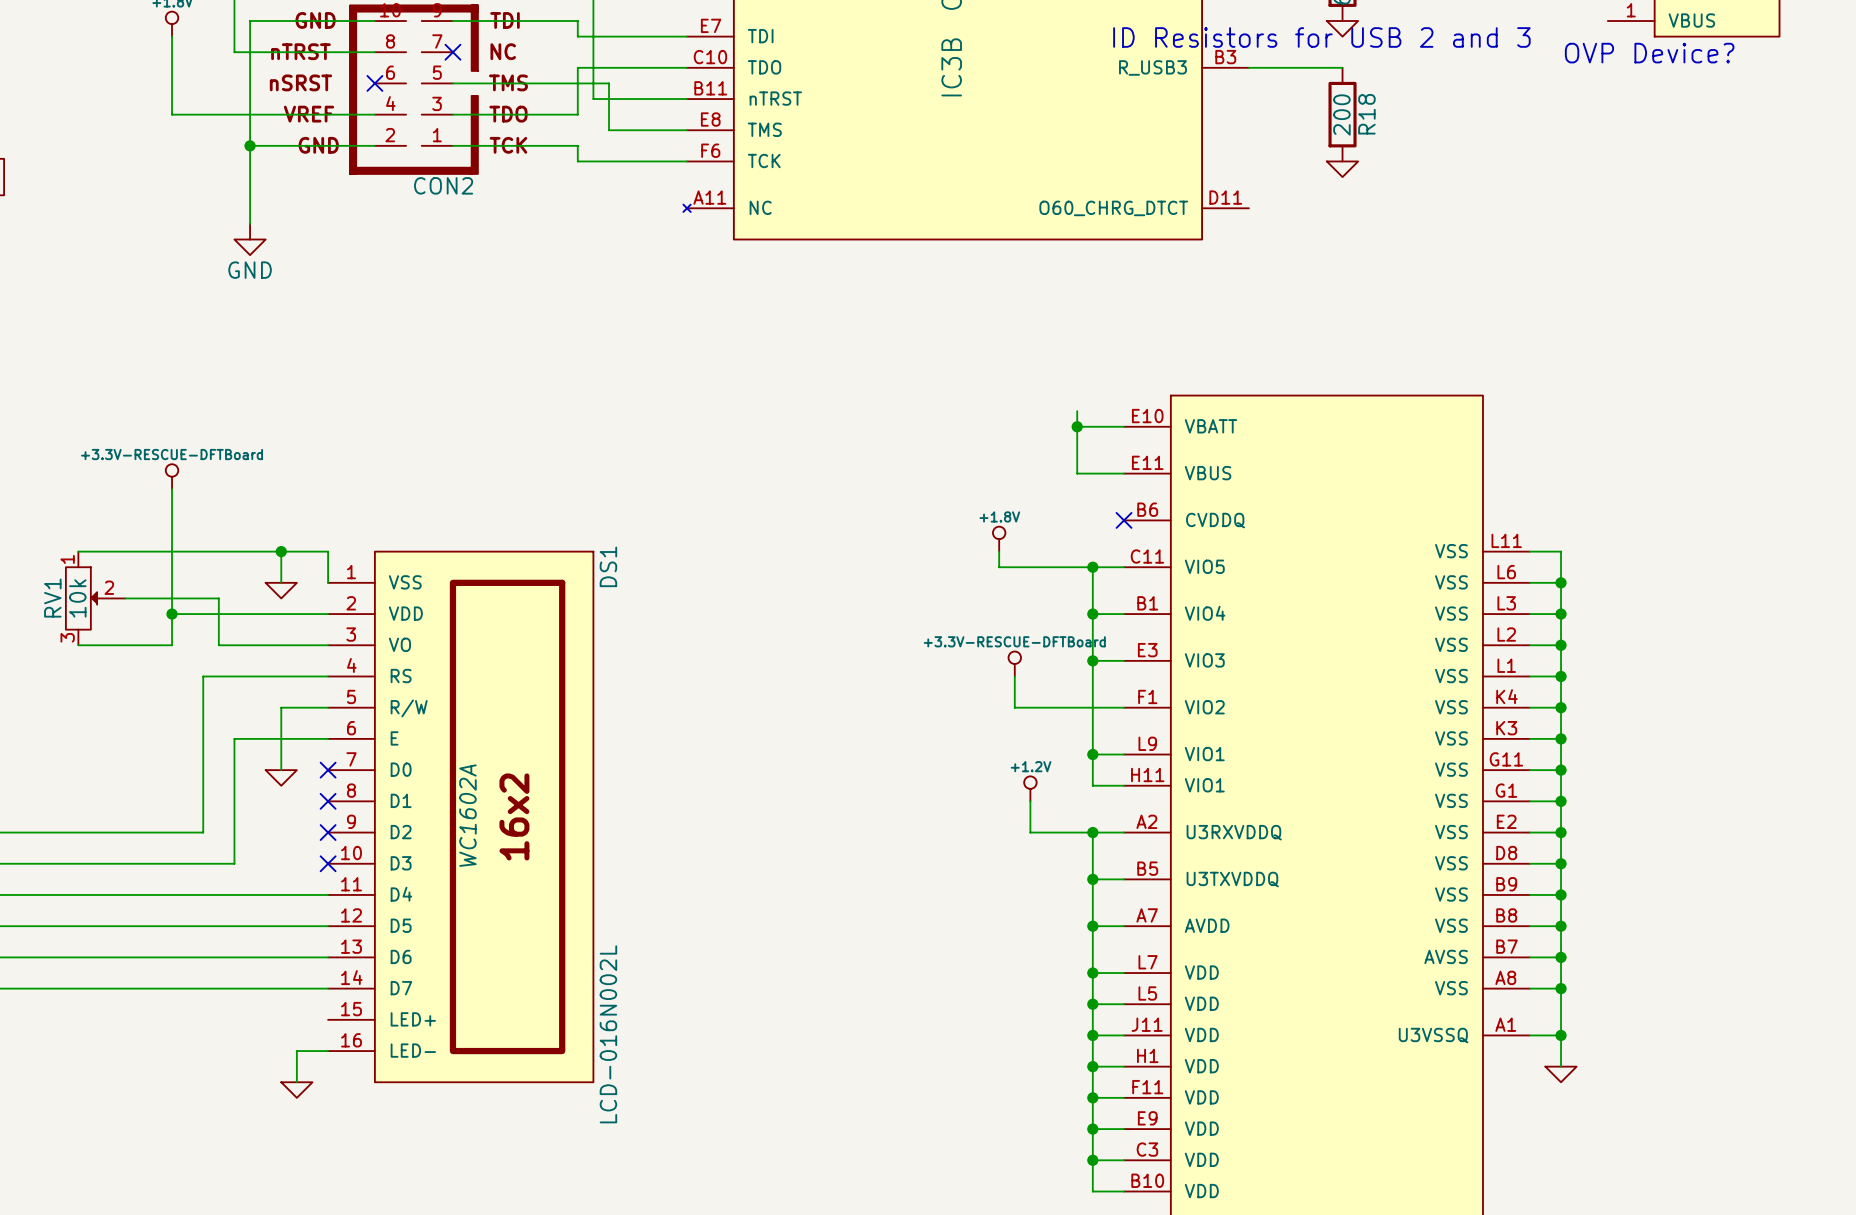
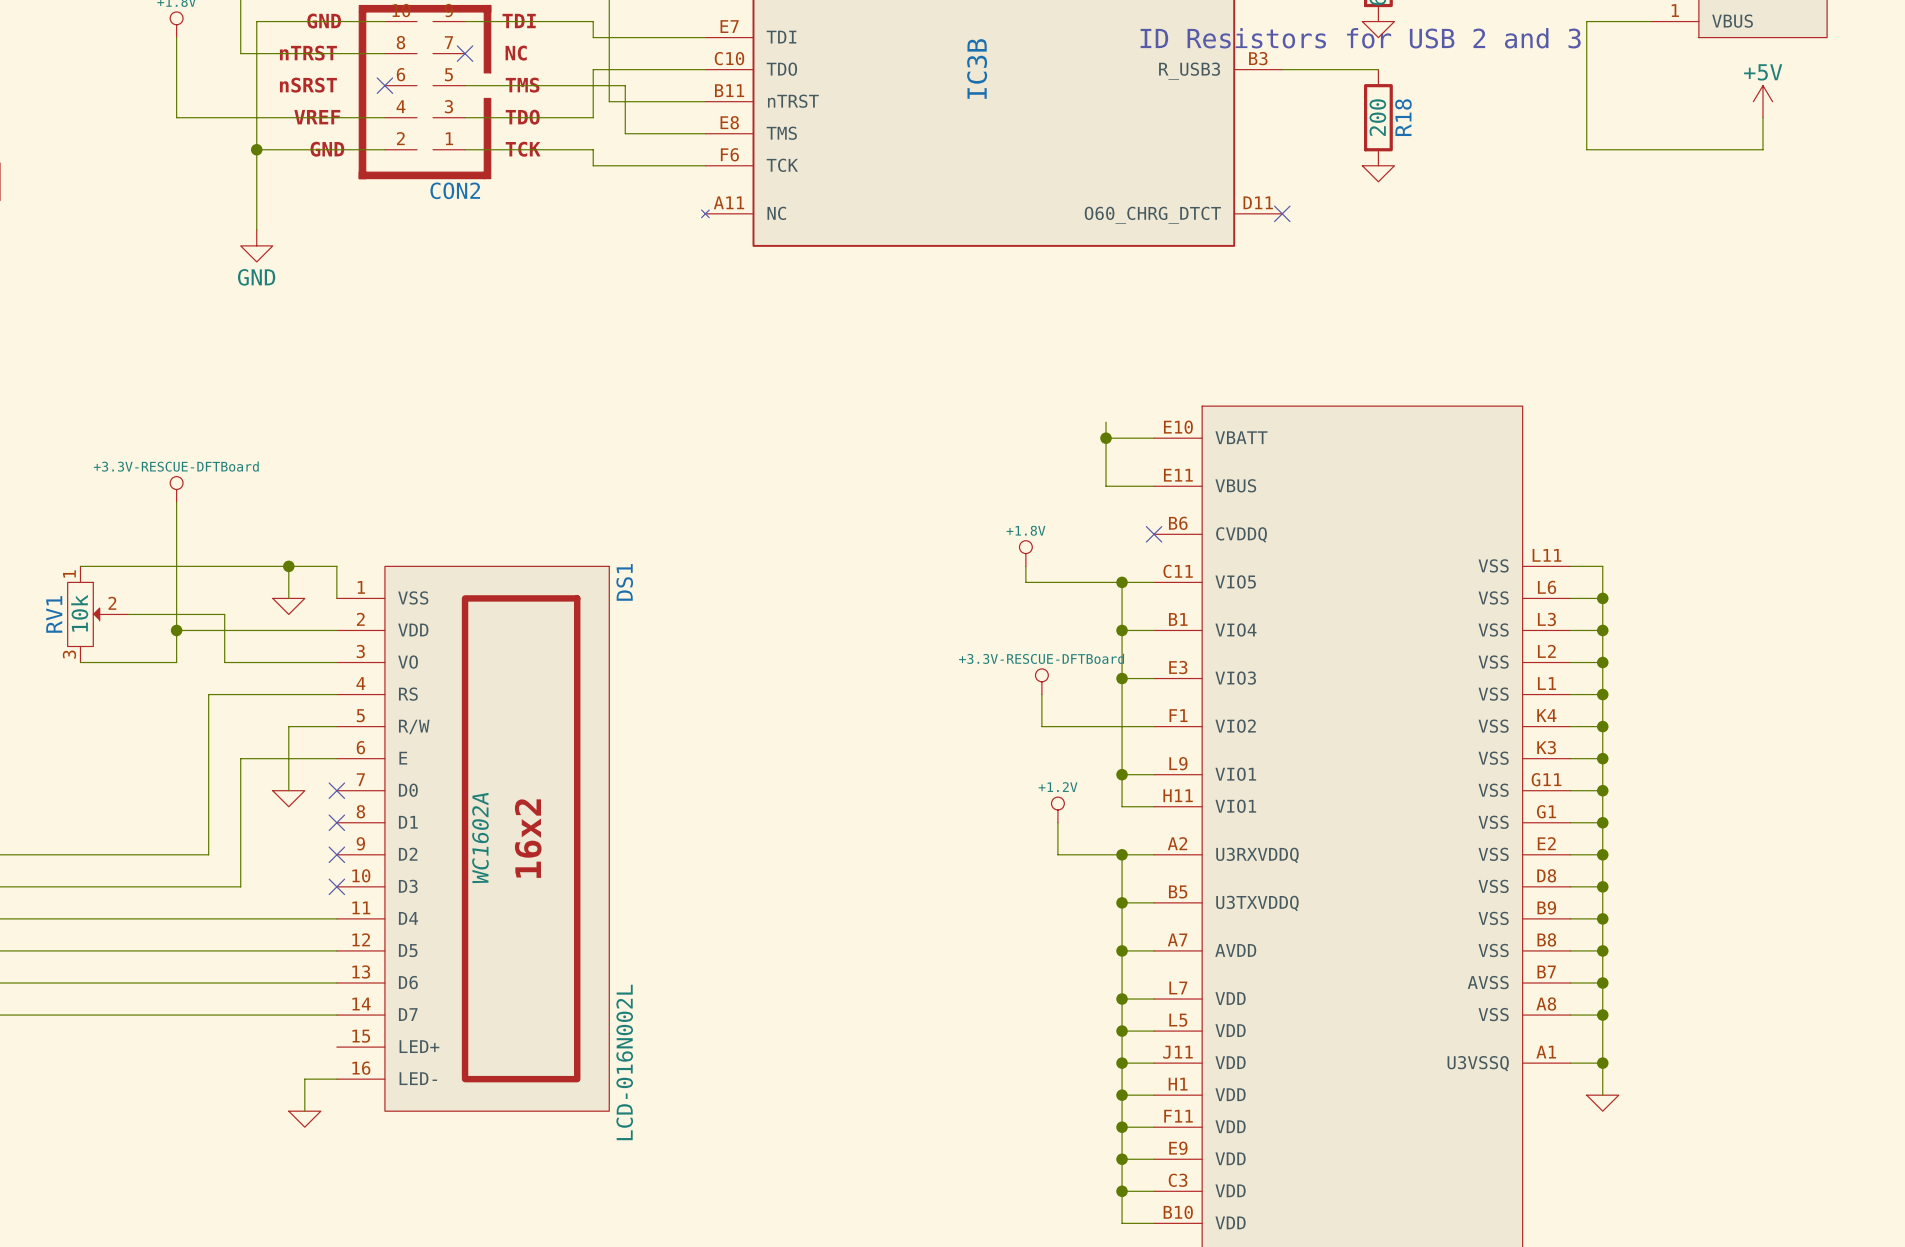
wire: none -> (1650, 21) (1586, 21) (1586, 149) (1762, 149) (1762, 117)
text: OVP Device? (1649, 53) -> none
power symbol: none -> +5V (1762, 101)
no-connect mark: none -> (1282, 213)

